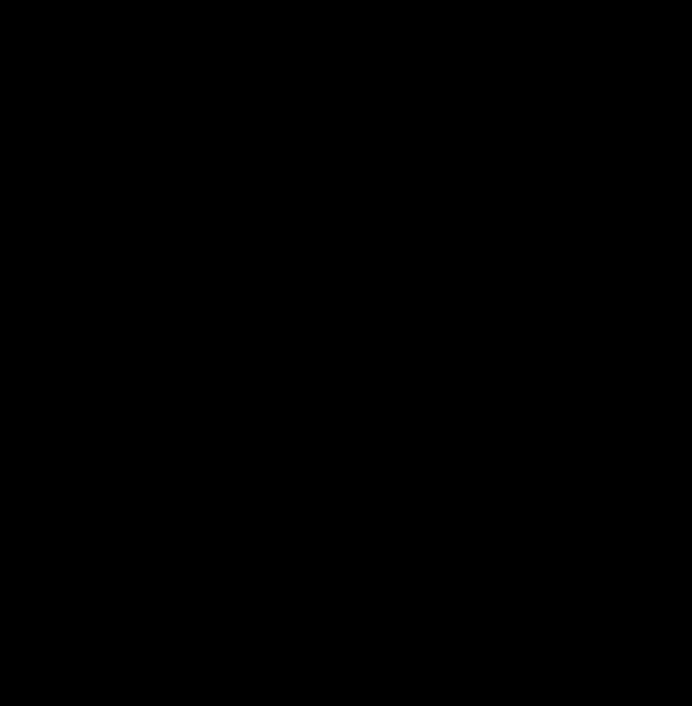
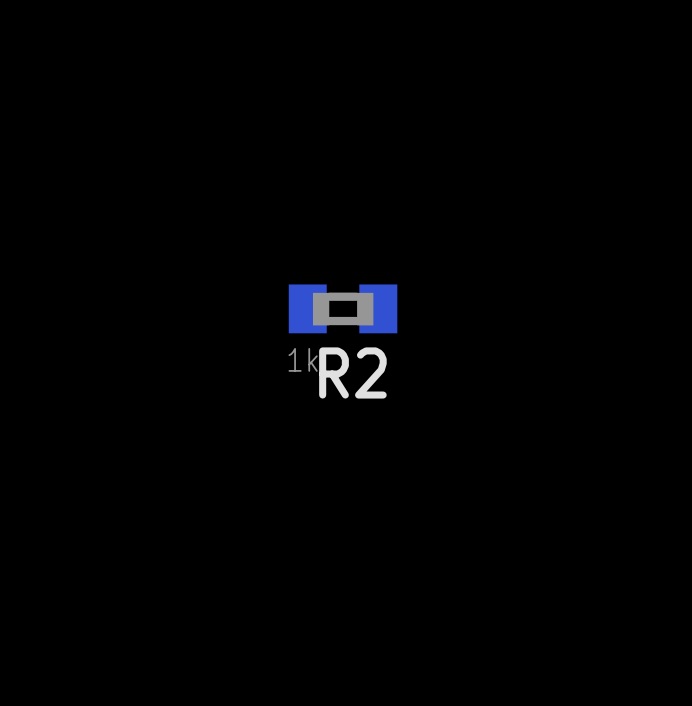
R2: none -> 1k (343, 308)

